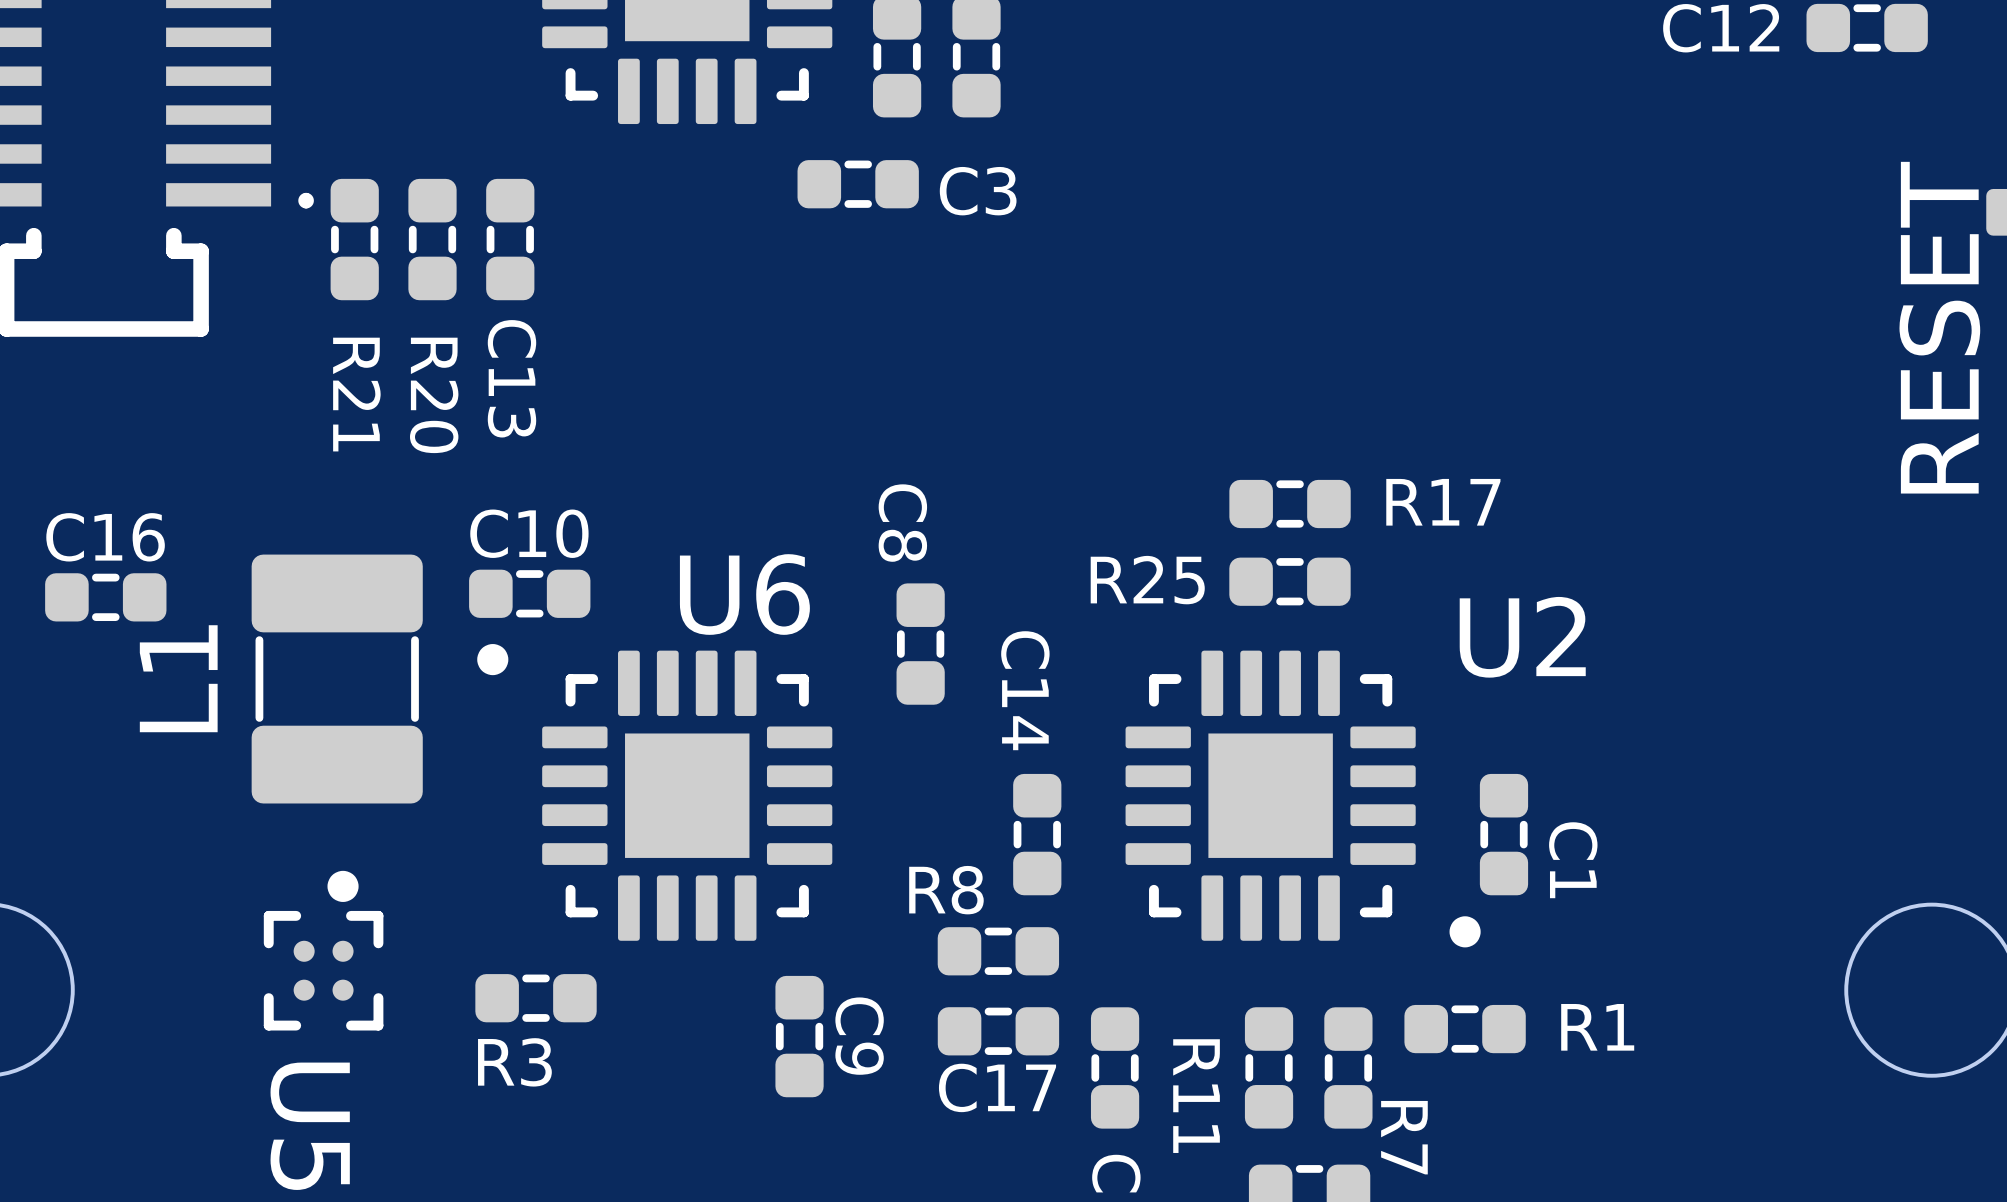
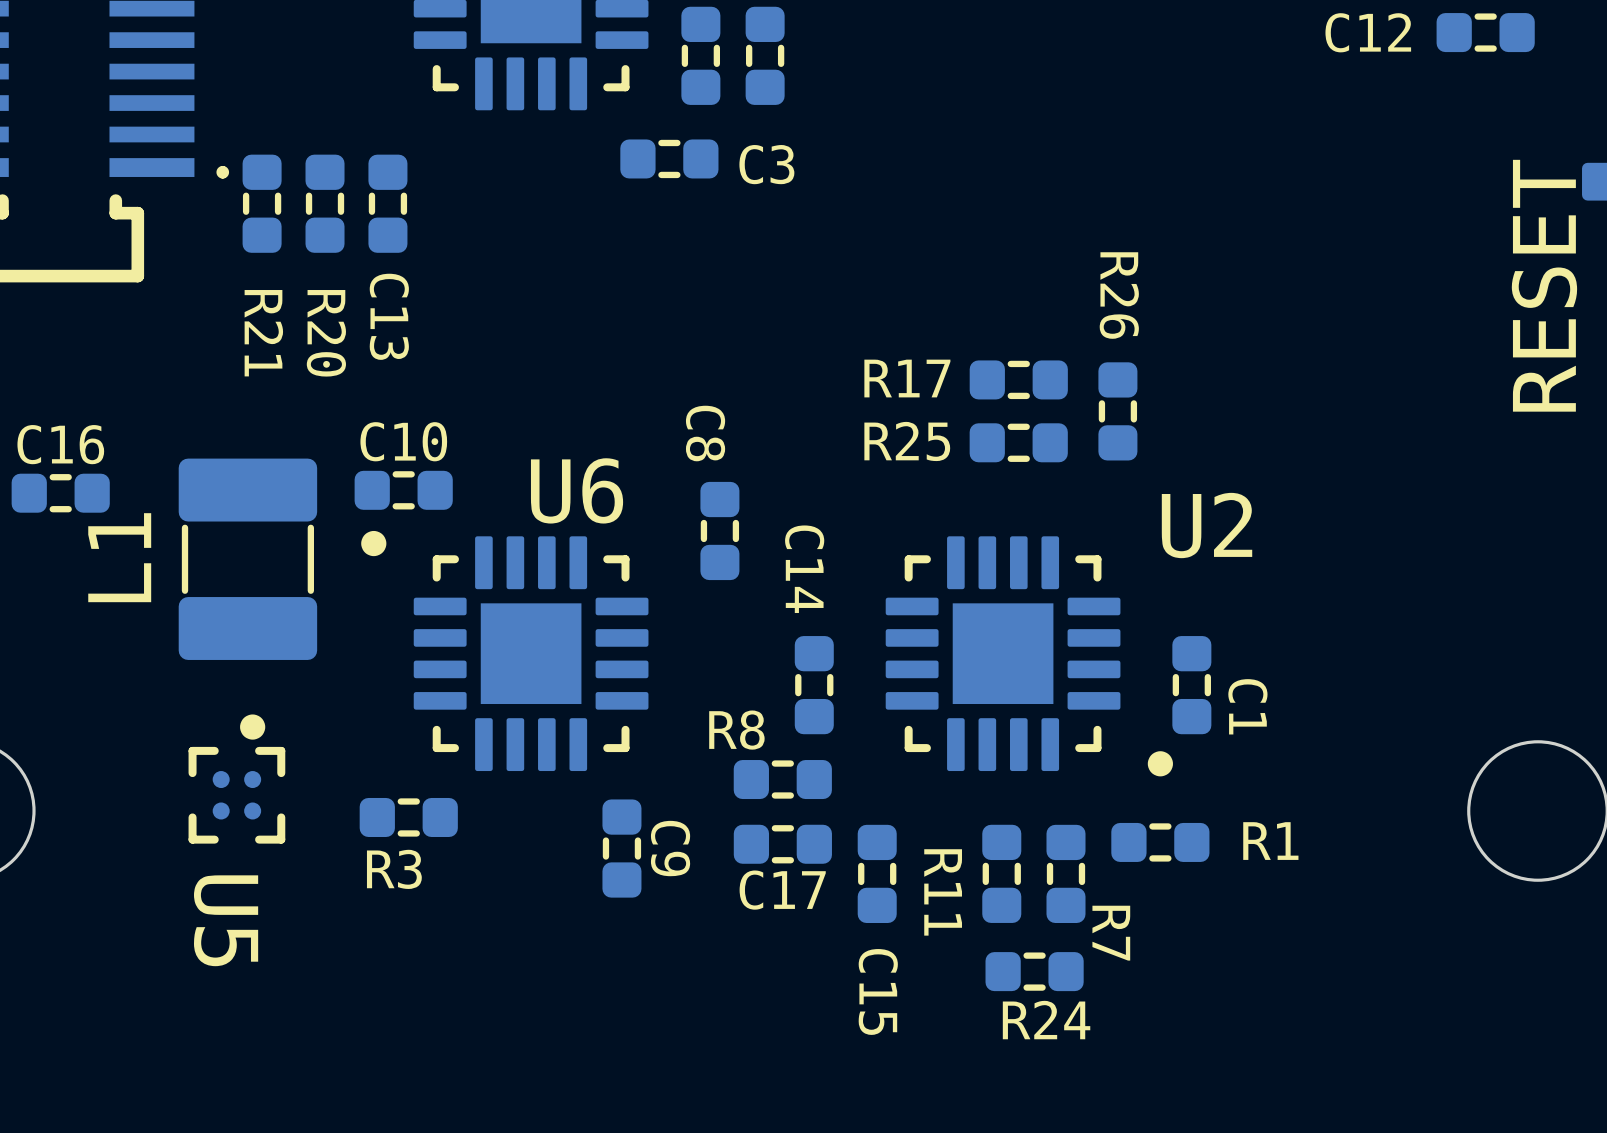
R26: none -> (1117, 411)
R17 name position: R17 (1443, 502) -> R17 (907, 378)
R17 position: (1290, 504) -> (1018, 379)
R25 position: (1289, 581) -> (1018, 442)

